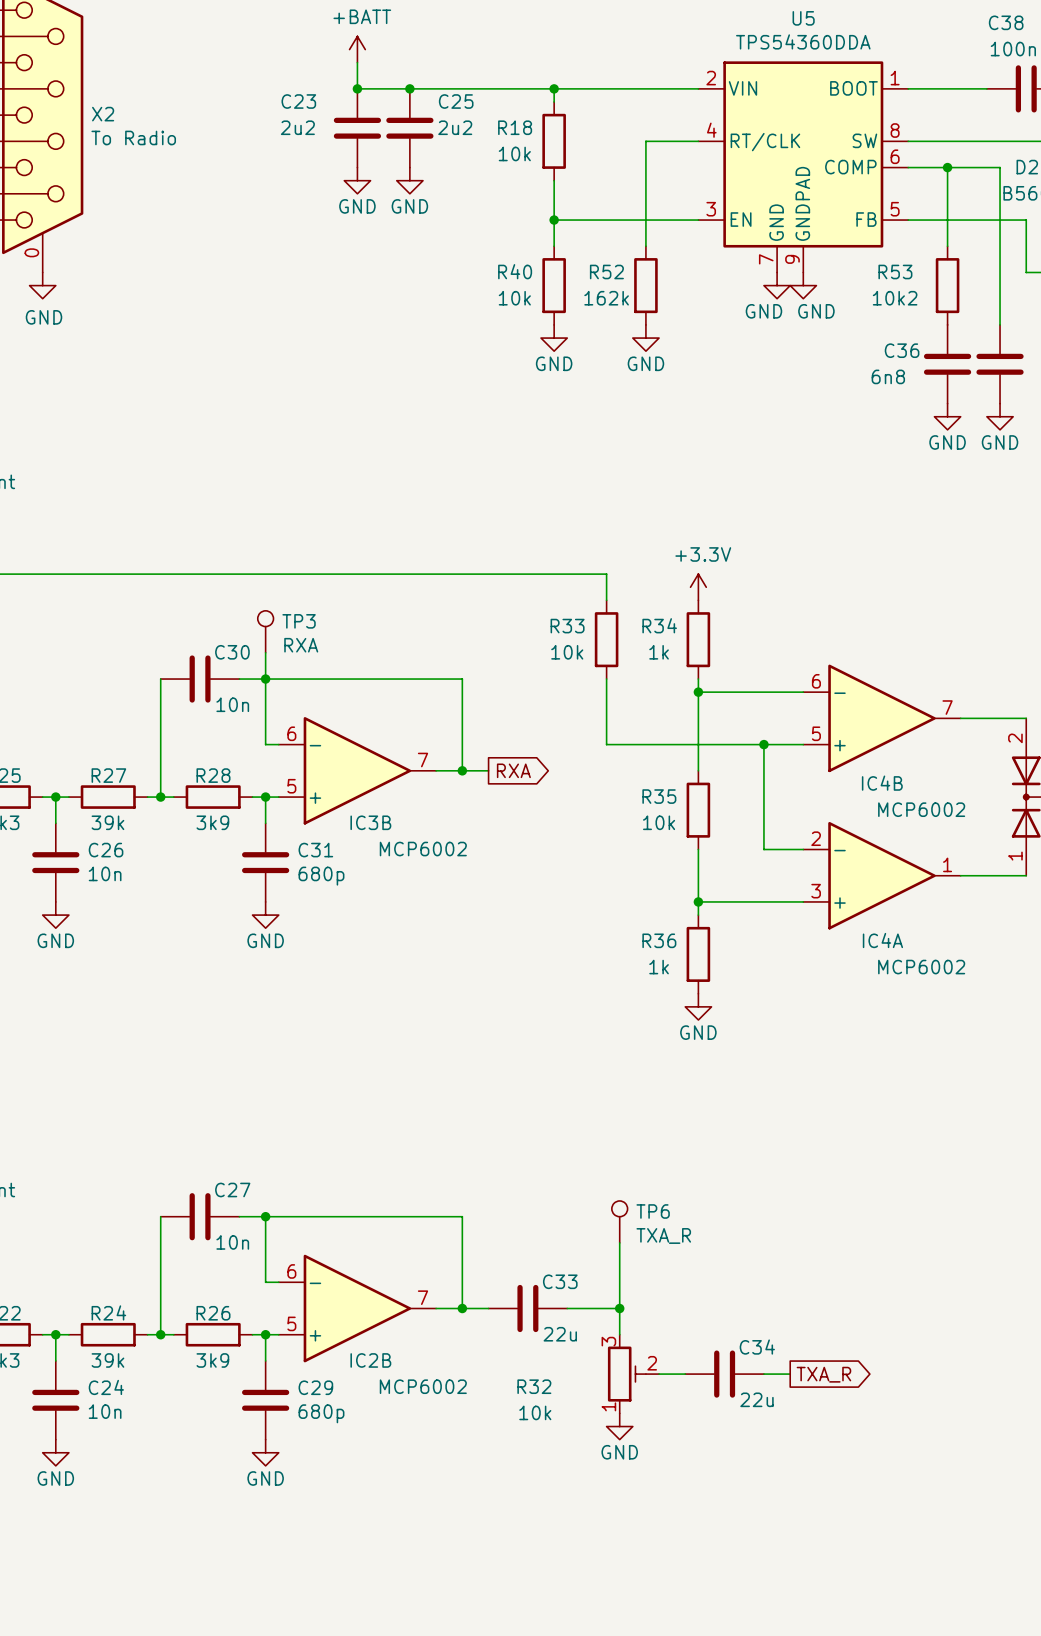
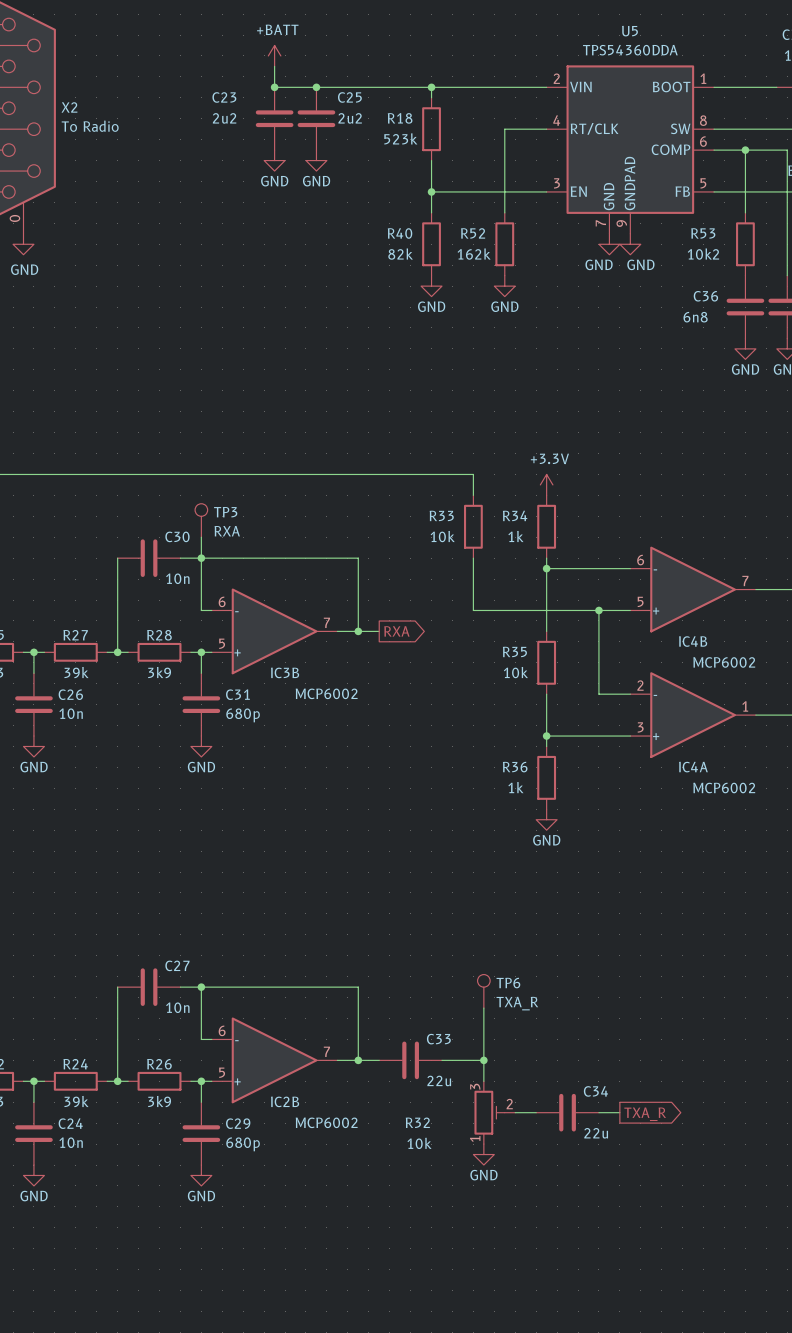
R18 value: 10k (514, 153) -> 523k (400, 138)
R40 value: 10k (514, 298) -> 82k (400, 254)

